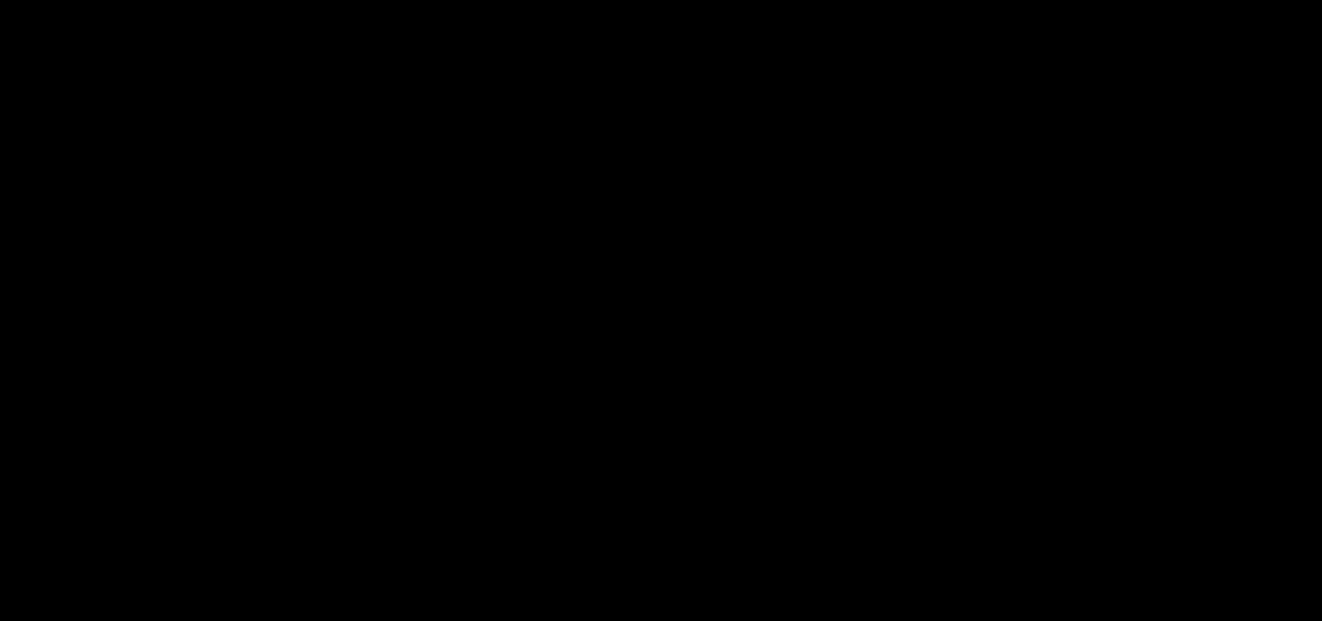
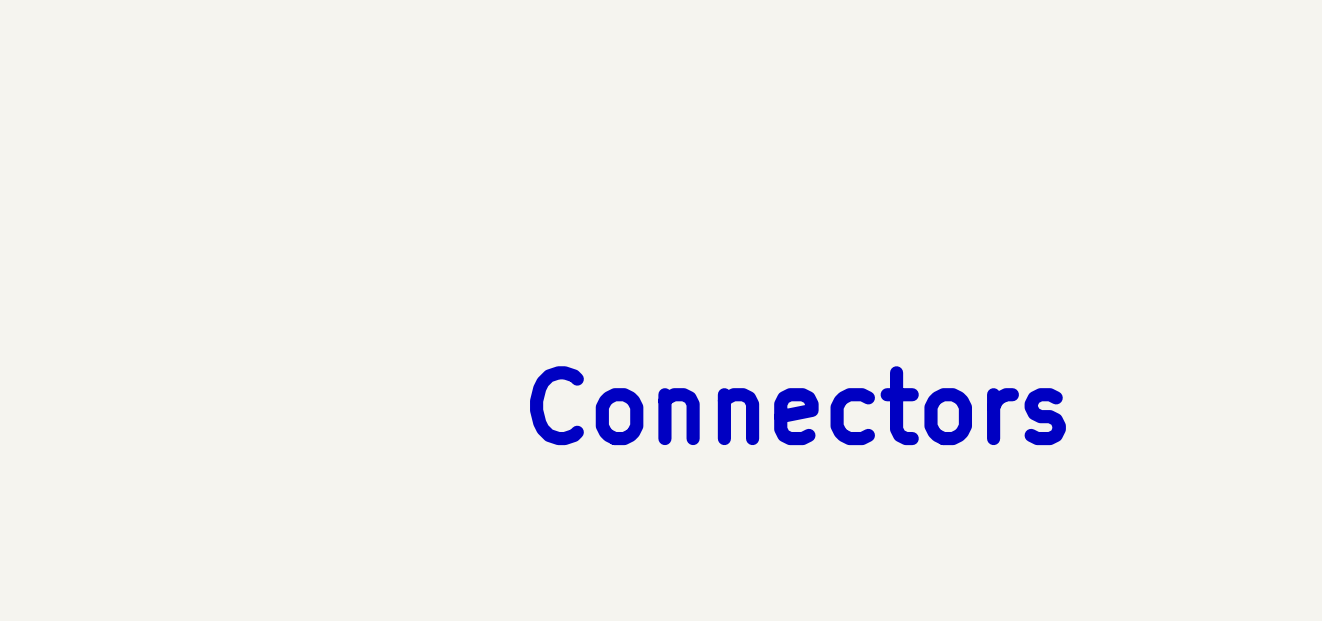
text: none -> Connectors (797, 405)

